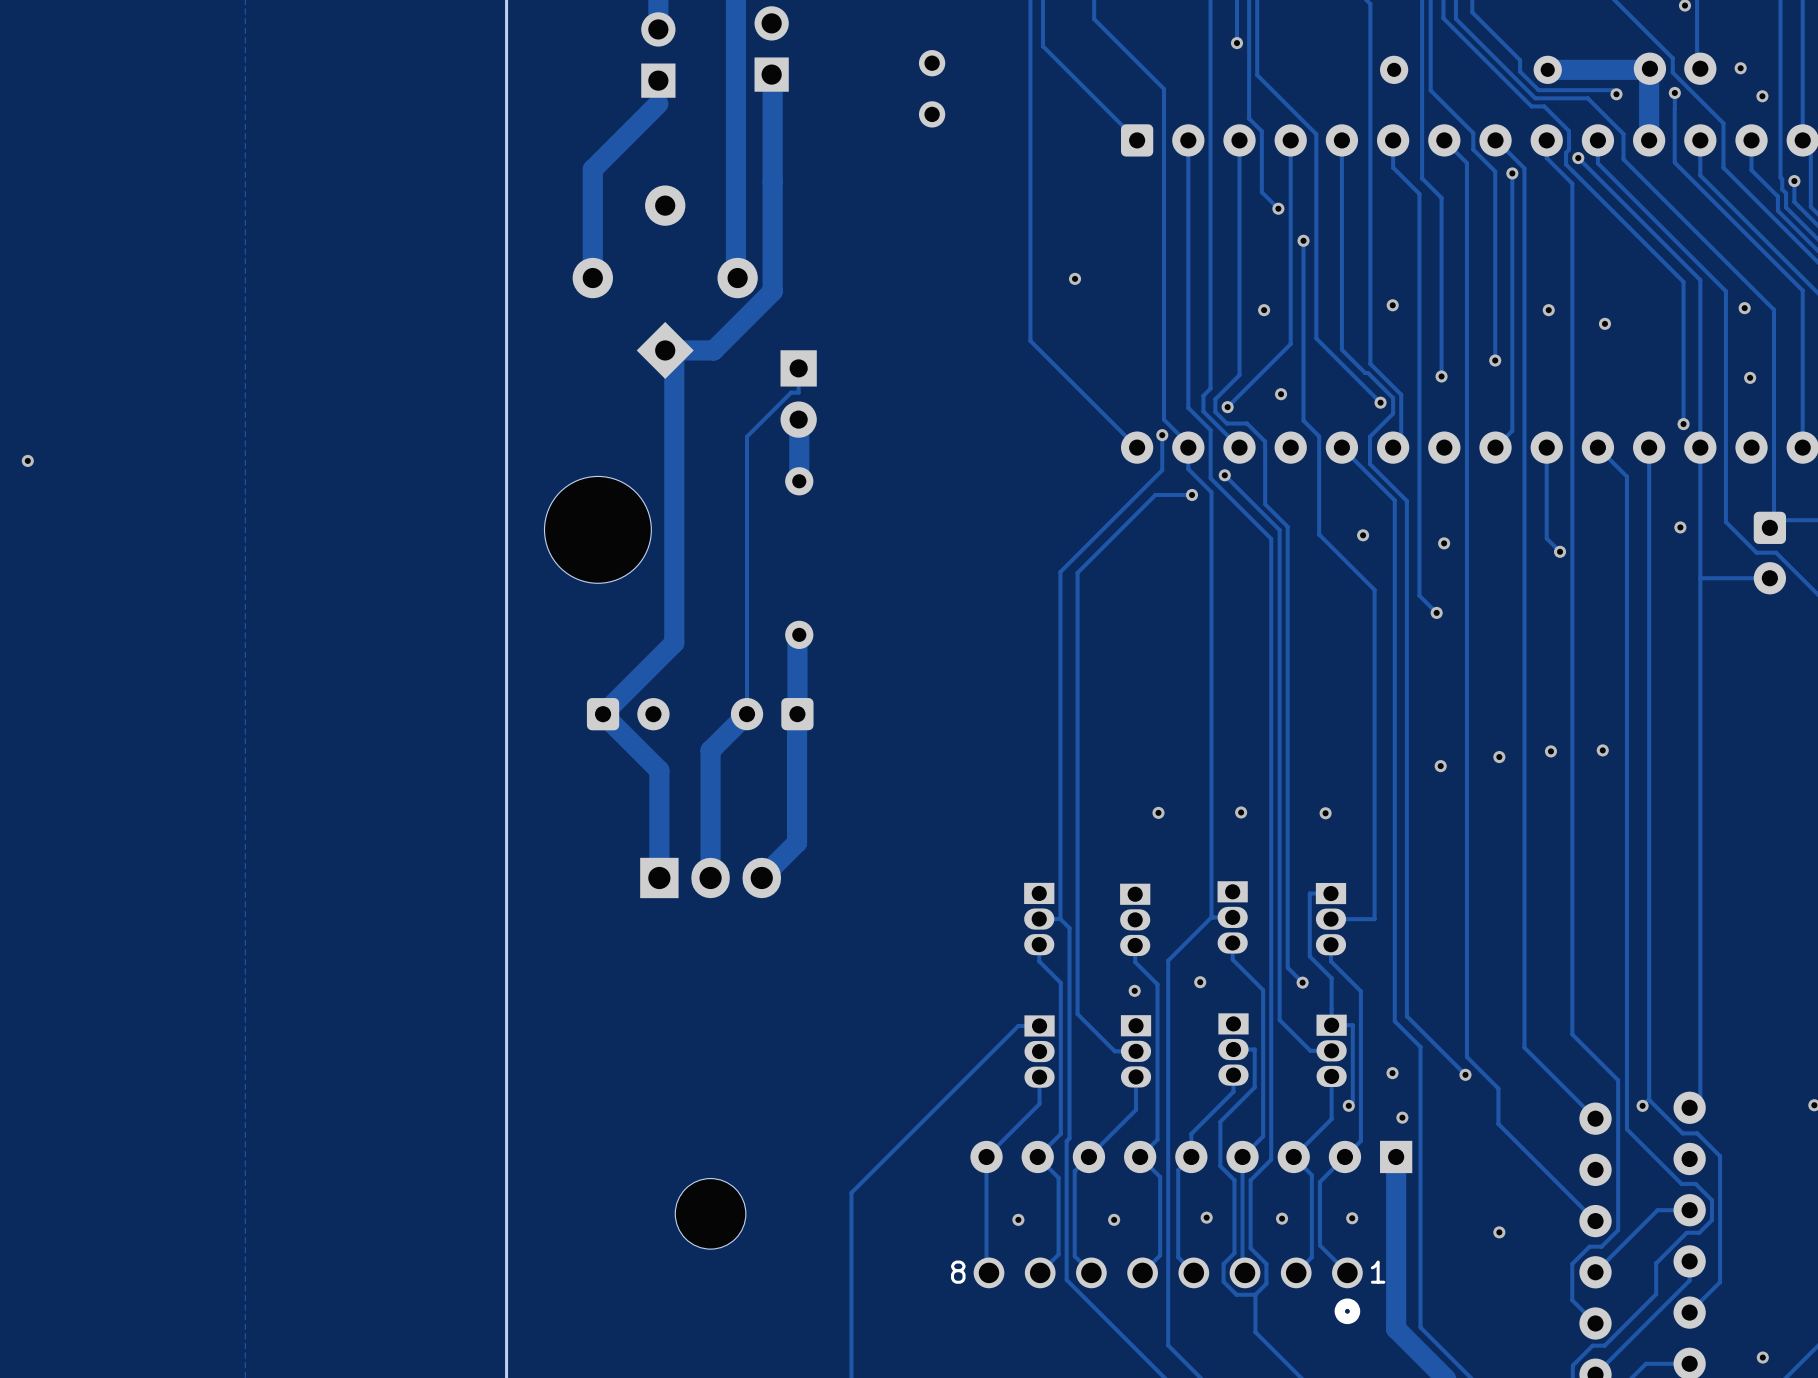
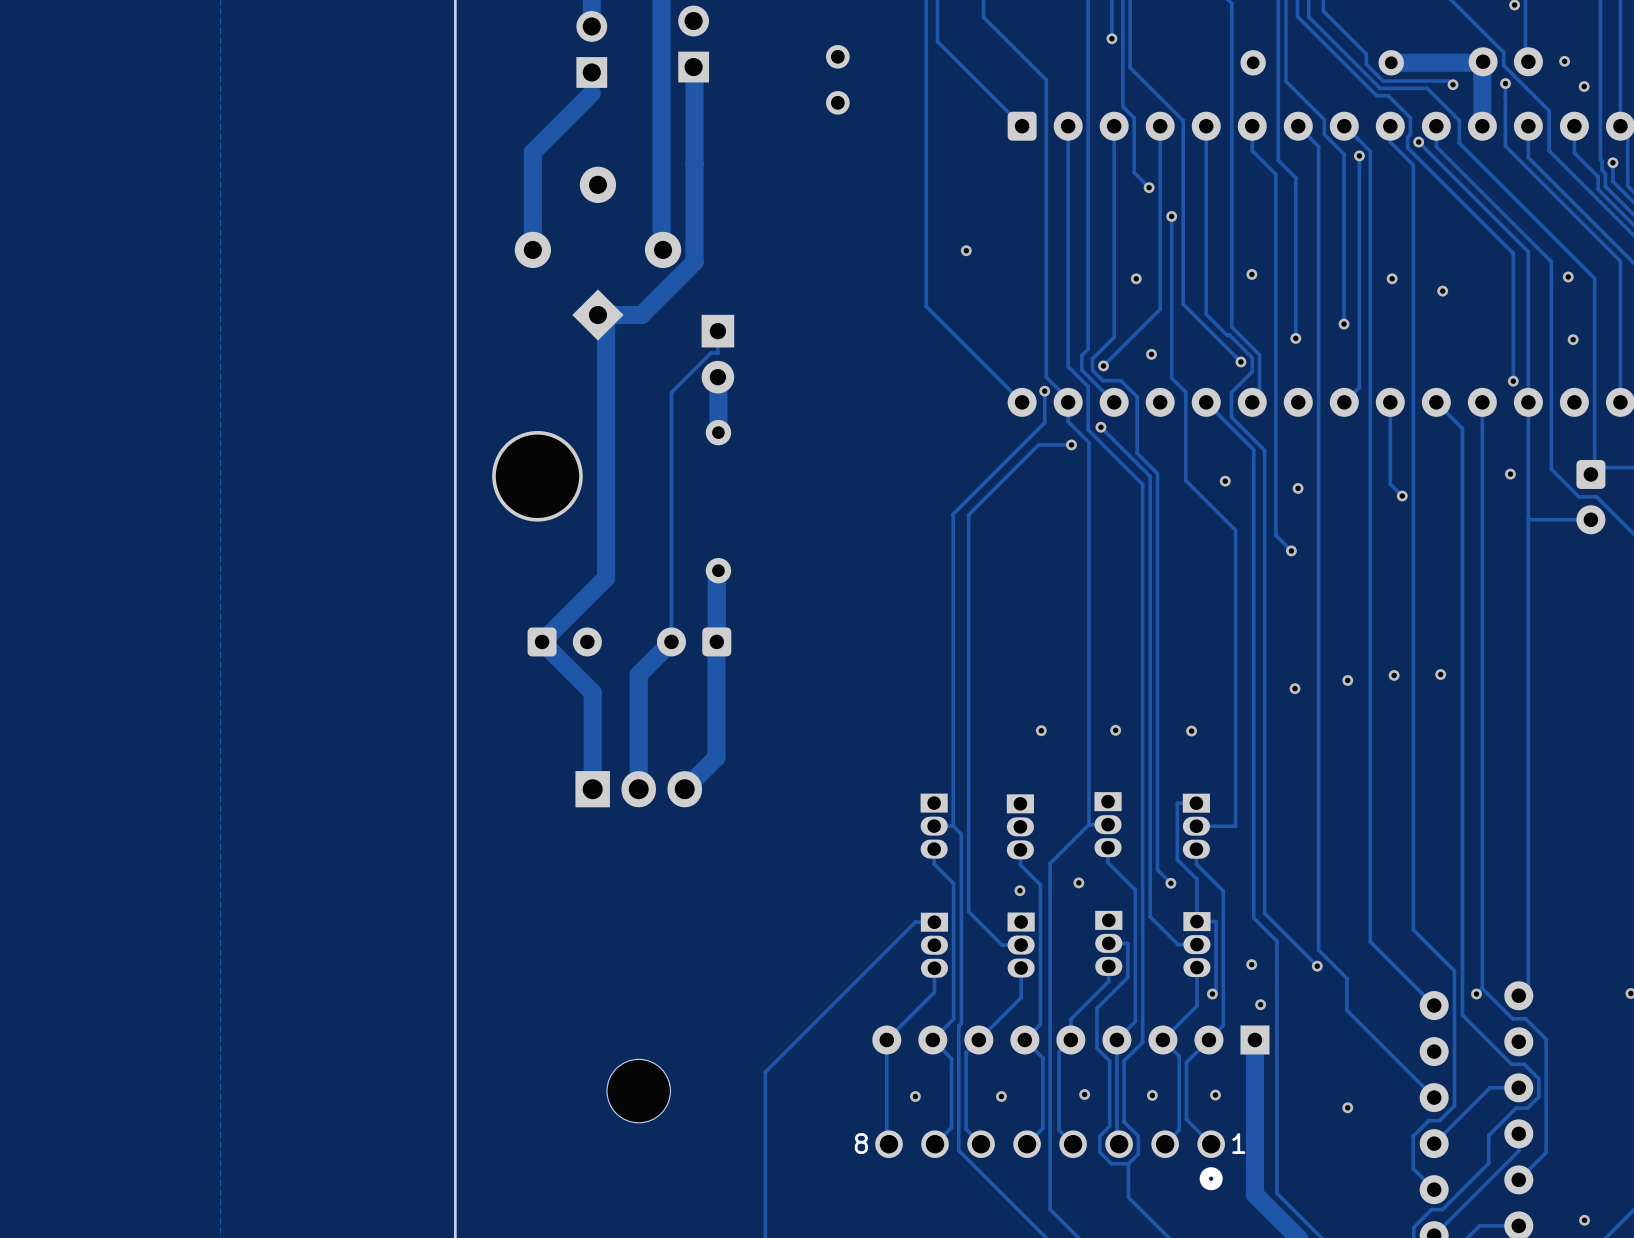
via: (27, 460) -> none
part footprint: [544, 476, 652, 584] -> [492, 430, 583, 522]

